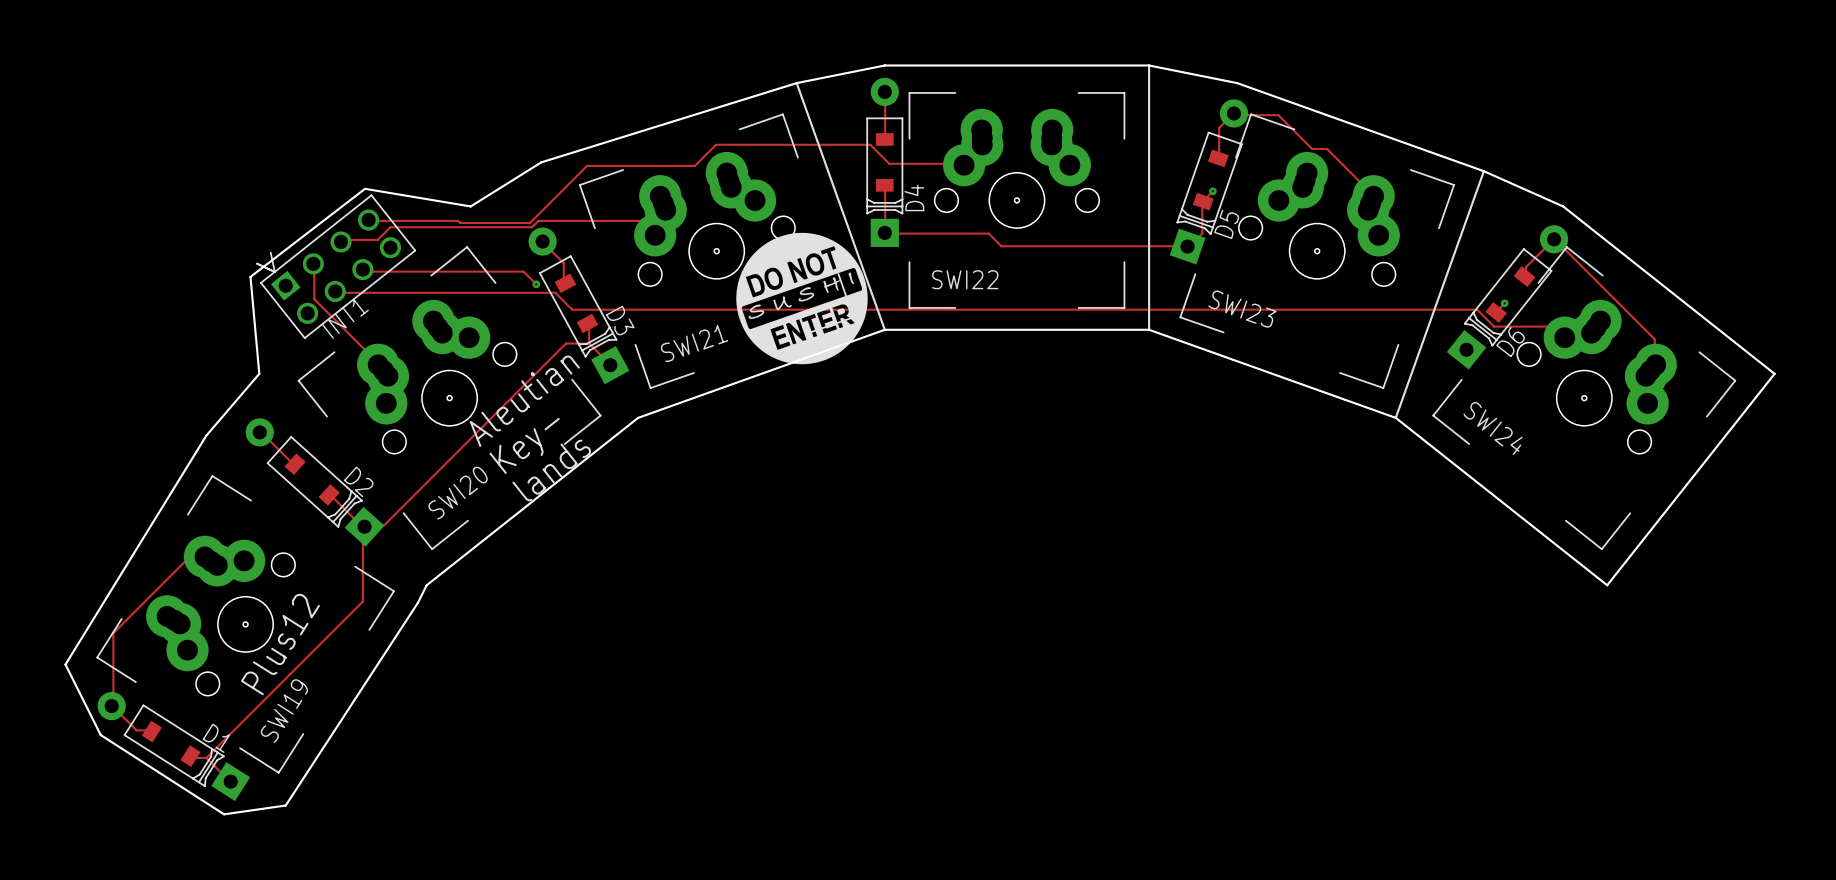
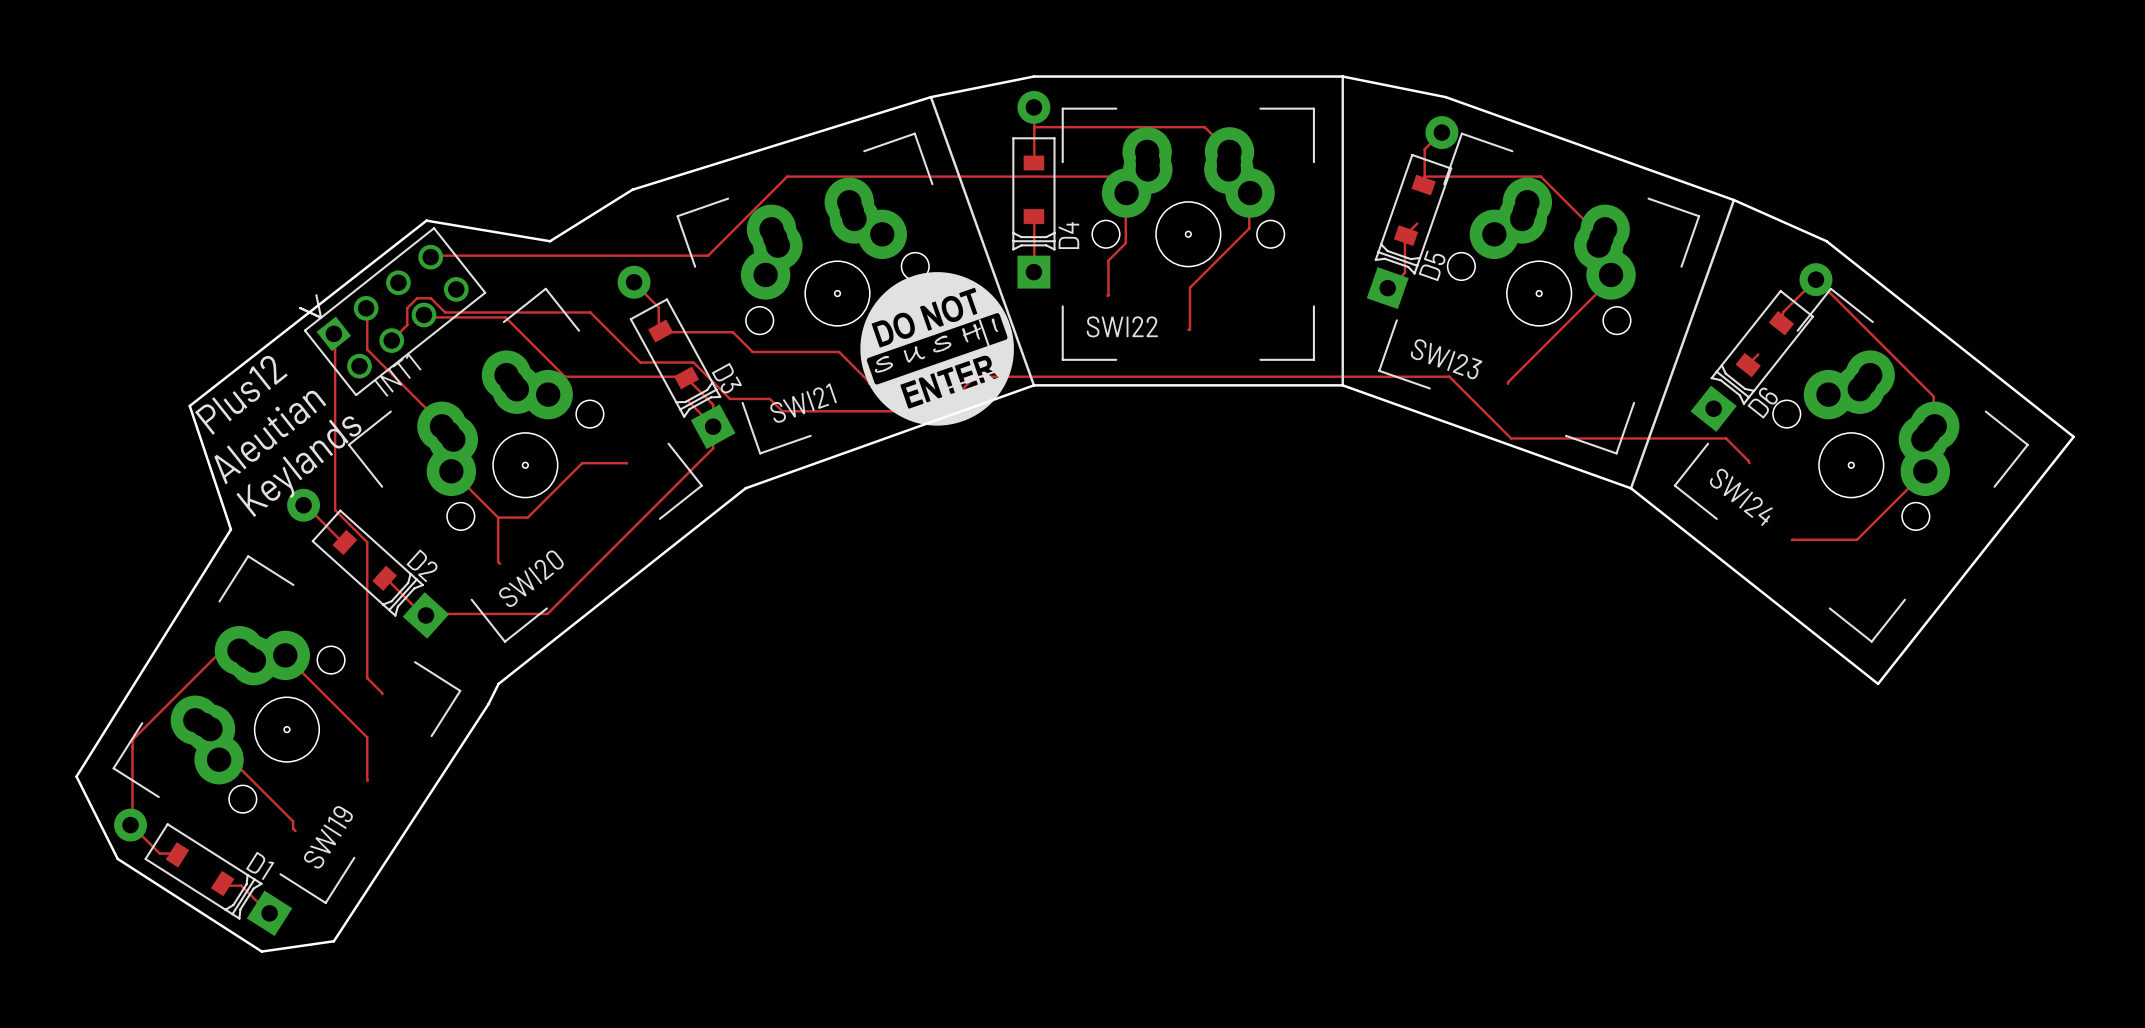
track: none -> (1034, 127) (1204, 127) (1229, 151)
track: (1233, 113) (1234, 115) (1278, 115) (1312, 149) (1327, 149) (1373, 195) (1368, 210) -> none
track: none -> (1228, 161) (1229, 171) (1250, 193) (1249, 228) (1189, 287) (1189, 329) (1188, 329)
track: none -> (1424, 176) (1540, 176) (1600, 235) (1605, 229) (1600, 245) (1610, 255) (1610, 280) (1507, 383)
track: (963, 163) (889, 163) (870, 144) (716, 144) (694, 165) (587, 165) (529, 223) (368, 220) -> (1125, 191) (1110, 176) (787, 176) (708, 255) (431, 255) (430, 257)
track: none -> (1126, 193) (1125, 243) (1108, 260) (1107, 295)
board edge: (365, 188) (250, 276) (259, 373) (206, 435) (65, 664) -> (426, 220) (189, 405) (230, 529) (76, 776)
via: (1212, 191) -> none
track: (660, 196) (665, 210) (648, 227) (655, 235) (642, 220) (538, 220) (532, 227) (390, 227) (377, 239) (341, 239) (340, 241) -> none
track: (884, 232) (988, 233) (1001, 246) (1187, 246) -> none
track: (432, 271) (523, 271) (536, 284) -> none
track: none -> (660, 331) (732, 332) (752, 352) (839, 352) (868, 383)
via: (536, 284) -> none
track: none -> (333, 333) (335, 510) (367, 542) (367, 678) (382, 694)
track: none -> (391, 340) (407, 325) (407, 308) (417, 298) (430, 298) (445, 312) (590, 312) (640, 362) (693, 362) (730, 398) (769, 398) (782, 411) (940, 411) (975, 376) (1449, 376) (1511, 438) (1726, 438) (1749, 463)
track: (335, 292) (555, 292) (572, 309) (1477, 309) (1494, 326) (1553, 326) (1564, 337) -> none
via: (1504, 303) -> none
track: (587, 323) (589, 324) (589, 343) (565, 343) (384, 525) -> (505, 317) (564, 376) (685, 376) (713, 404) (713, 448) (547, 613) (448, 613)
track: none -> (1923, 439) (1934, 426) (1923, 440) (1925, 471) (1857, 539) (1791, 540)
text: none -> Keylands (299, 466)
track: none -> (627, 463) (582, 463) (527, 517) (498, 517)
text position: Aleutian (524, 401) -> Aleutian (270, 437)
track: none -> (451, 471) (498, 517)
track: none -> (498, 517) (498, 562) (500, 563)
text: Key- (524, 445) -> none
text: lands (551, 470) -> none
track: (362, 527) (362, 601) (206, 757) -> none
track: none -> (247, 656) (256, 658) (258, 655) (285, 655) (367, 737) (367, 780)
text rotation: 0° (280, 644) -> 19.2° clockwise (241, 395)
text position: Plus12 (280, 644) -> Plus12 (241, 395)
track: none -> (219, 759) (221, 762) (233, 762) (293, 821) (293, 828) (295, 831)

